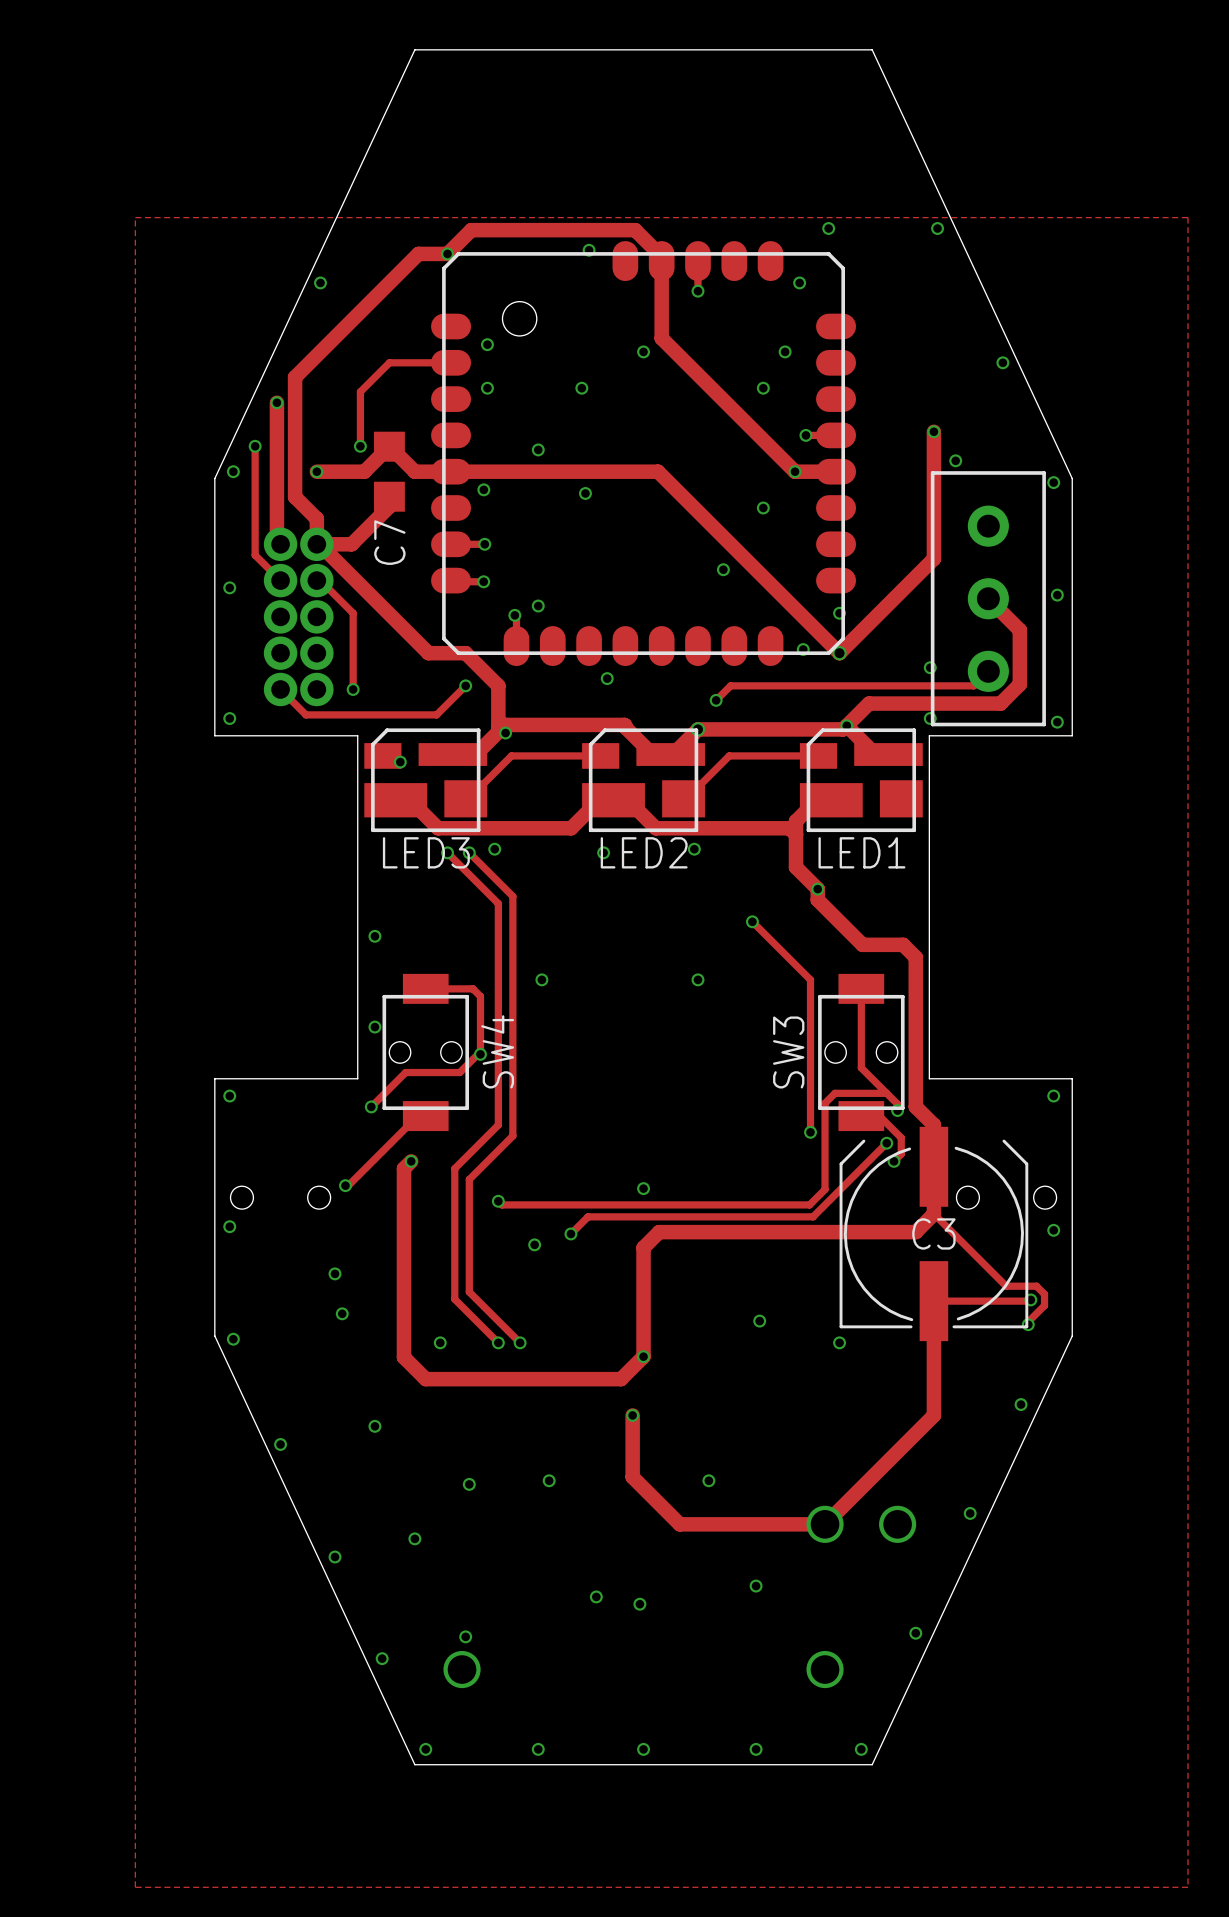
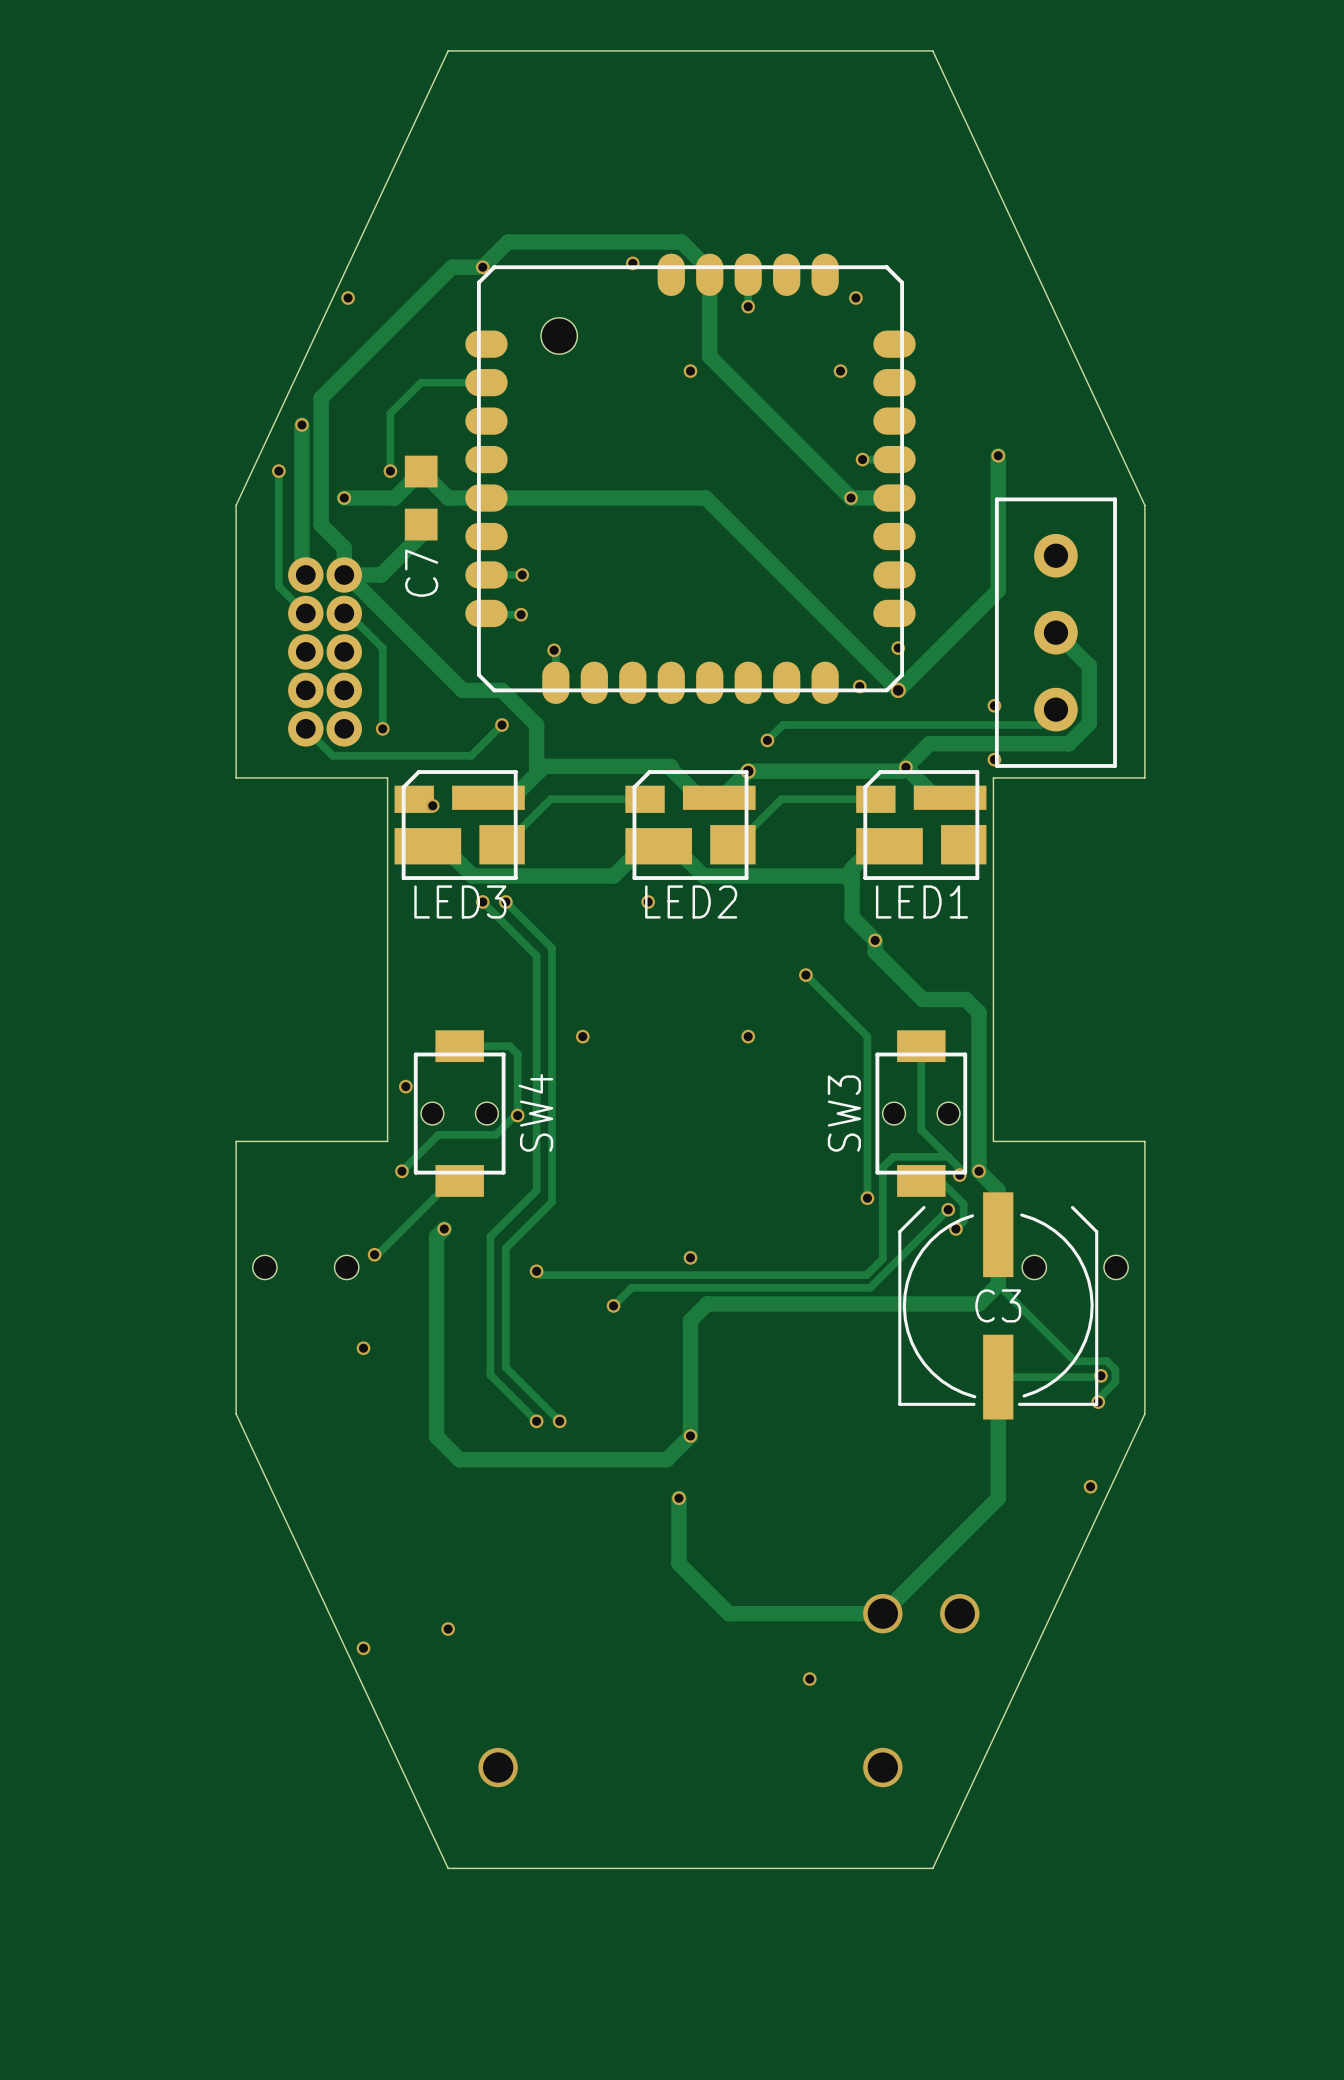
zone outline: (135, 217) (1188, 217) (1188, 1887) (135, 1887) (135, 217) -> none
via: (828, 228) -> none
via: (937, 228) -> none
via: (487, 344) -> none
via: (1002, 362) -> none
via: (487, 388) -> none
via: (581, 388) -> none
via: (763, 388) -> none
via: (538, 449) -> none
via: (955, 460) -> none
via: (233, 471) -> none
via: (1053, 482) -> none
via: (483, 489) -> none
via: (585, 493) -> none
via: (763, 508) -> none
via: (723, 569) -> none
via: (229, 587) -> none
via: (1057, 595) -> none
via: (538, 606) -> none
via: (607, 678) -> none
via: (229, 718) -> none
via: (1057, 722) -> none
via: (505, 733) -> none
via: (494, 849) -> none
via: (694, 849) -> none
via: (374, 936) -> none
via: (229, 1096) -> none
via: (1053, 1096) -> none
via: none -> (979, 1171)
via: (229, 1226) -> none
via: (1053, 1230) -> none
via: (534, 1244) -> none
via: (342, 1313) -> none
via: (759, 1321) -> none
via: (233, 1339) -> none
via: (440, 1342) -> none
via: (839, 1342) -> none
via: (374, 1426) -> none
via: (280, 1444) -> none
via: (549, 1480) -> none
via: (708, 1480) -> none
via: (469, 1484) -> none
via: (970, 1513) -> none
via: (596, 1596) -> none
via: (639, 1604) -> none
via: (915, 1633) -> none
via: (465, 1636) -> none
via: (382, 1658) -> none
via: (425, 1749) -> none
via: (538, 1749) -> none
via: (643, 1749) -> none
via: (756, 1749) -> none
via: (861, 1749) -> none

